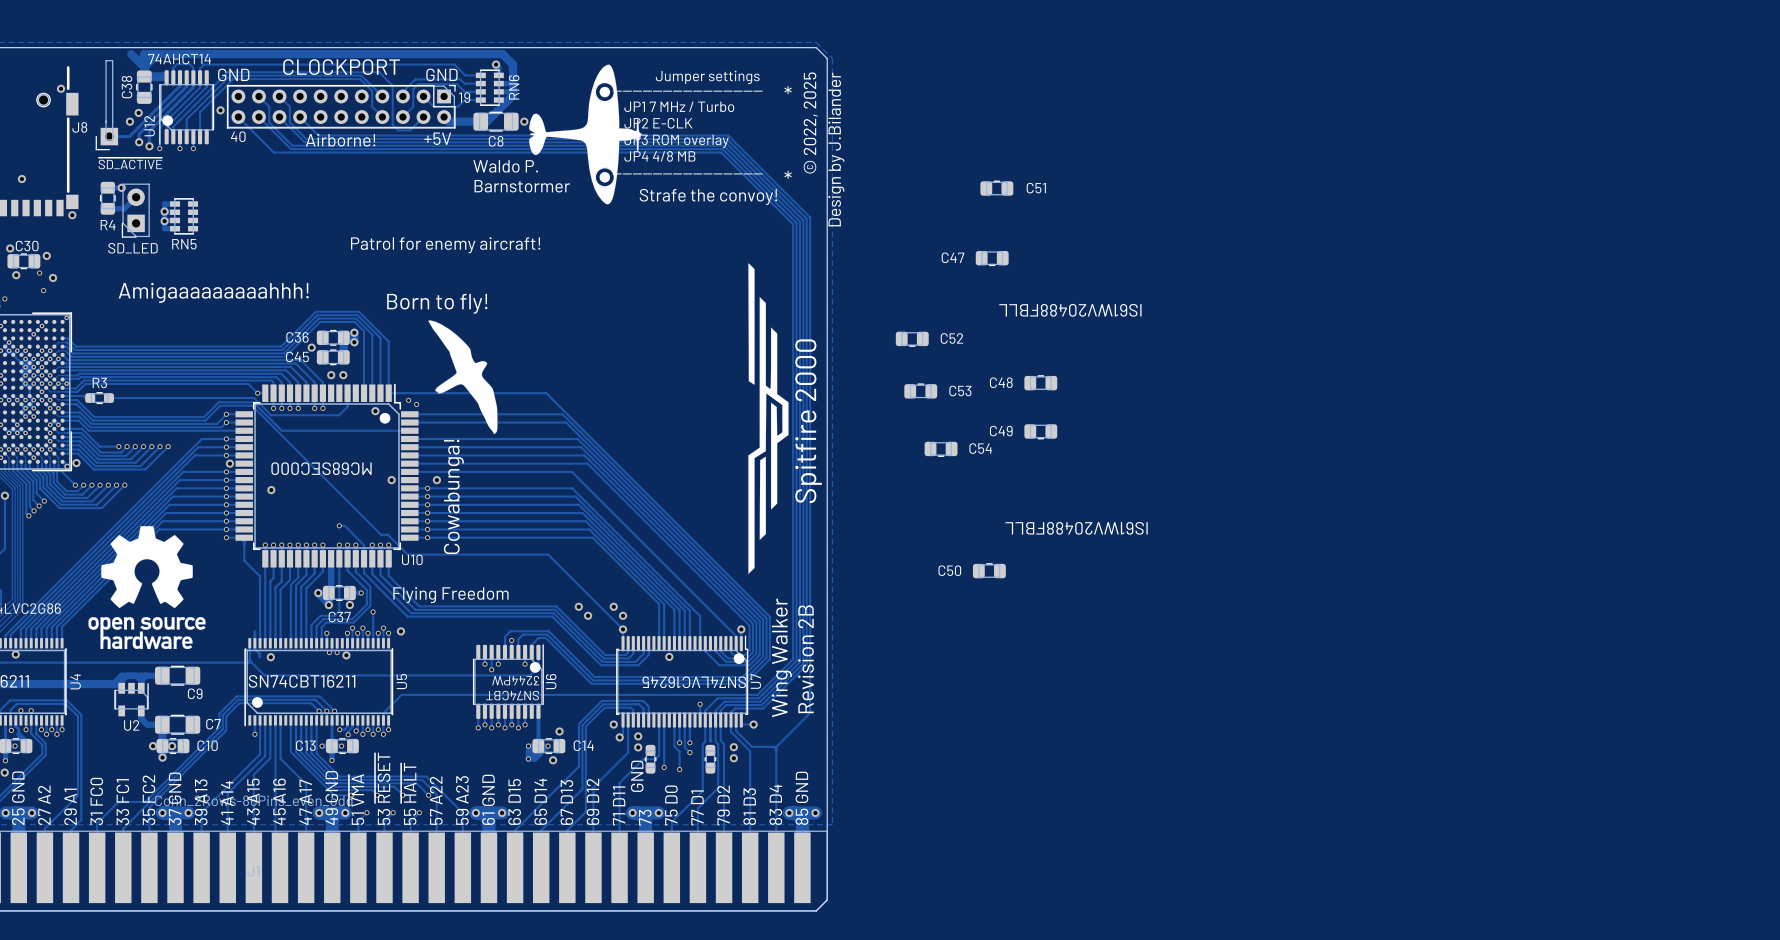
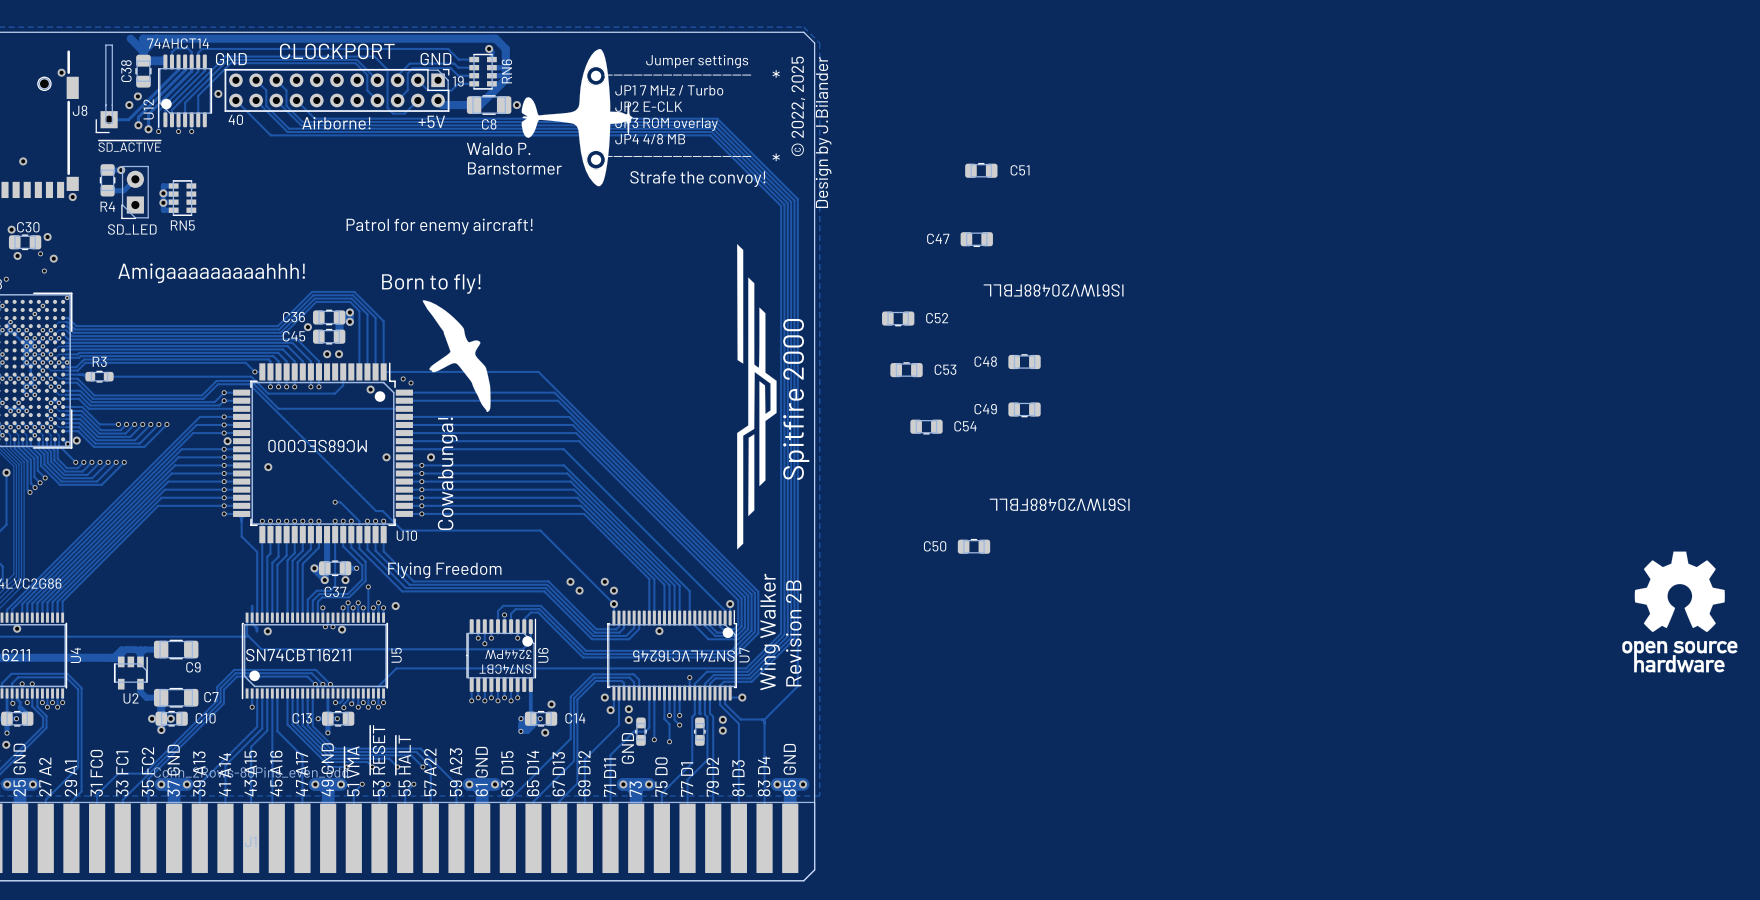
drawing: [88, 526, 206, 650] -> none
drawing: none -> [1622, 551, 1738, 673]

